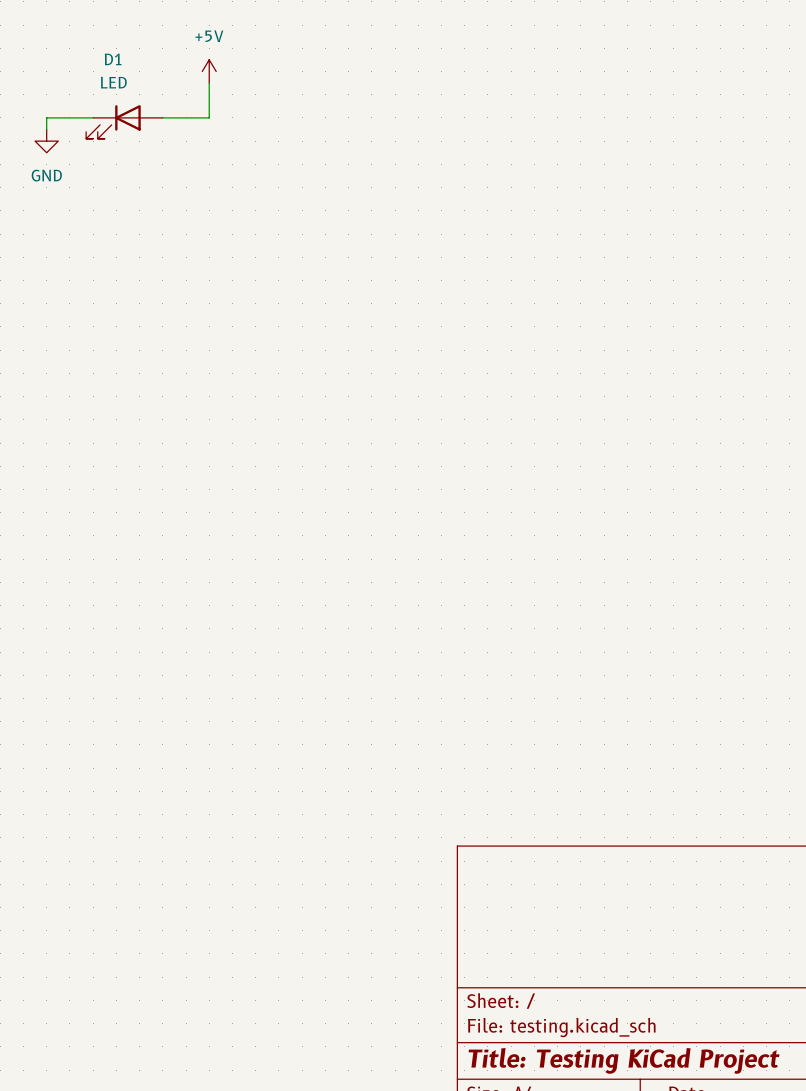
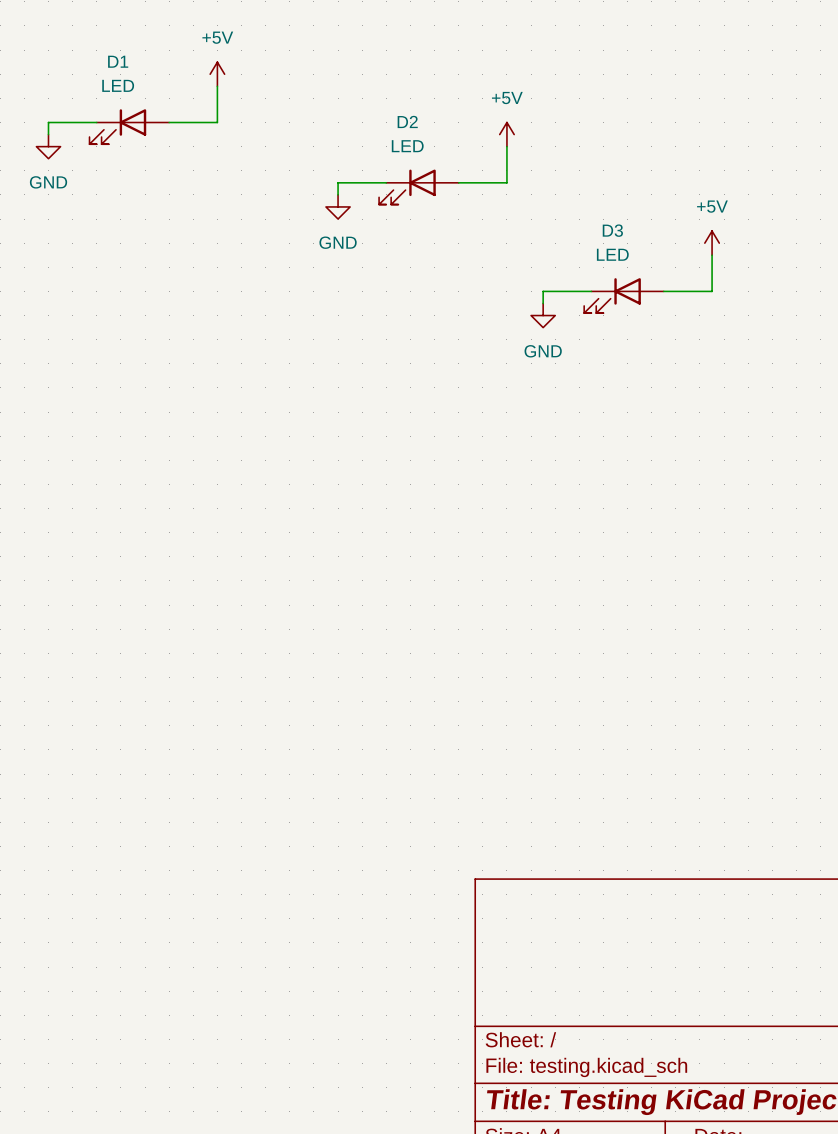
power symbol: none -> +5V (506, 134)
wire: none -> (506, 146) (506, 182) (458, 182)
wire: none -> (386, 182) (338, 182) (338, 194)
D2: none -> LED (418, 187)
power symbol: none -> GND (338, 206)
power symbol: none -> +5V (712, 243)
wire: none -> (712, 255) (712, 291) (663, 291)
wire: none -> (591, 291) (543, 291) (543, 303)
D3: none -> LED (623, 295)
power symbol: none -> GND (543, 315)

